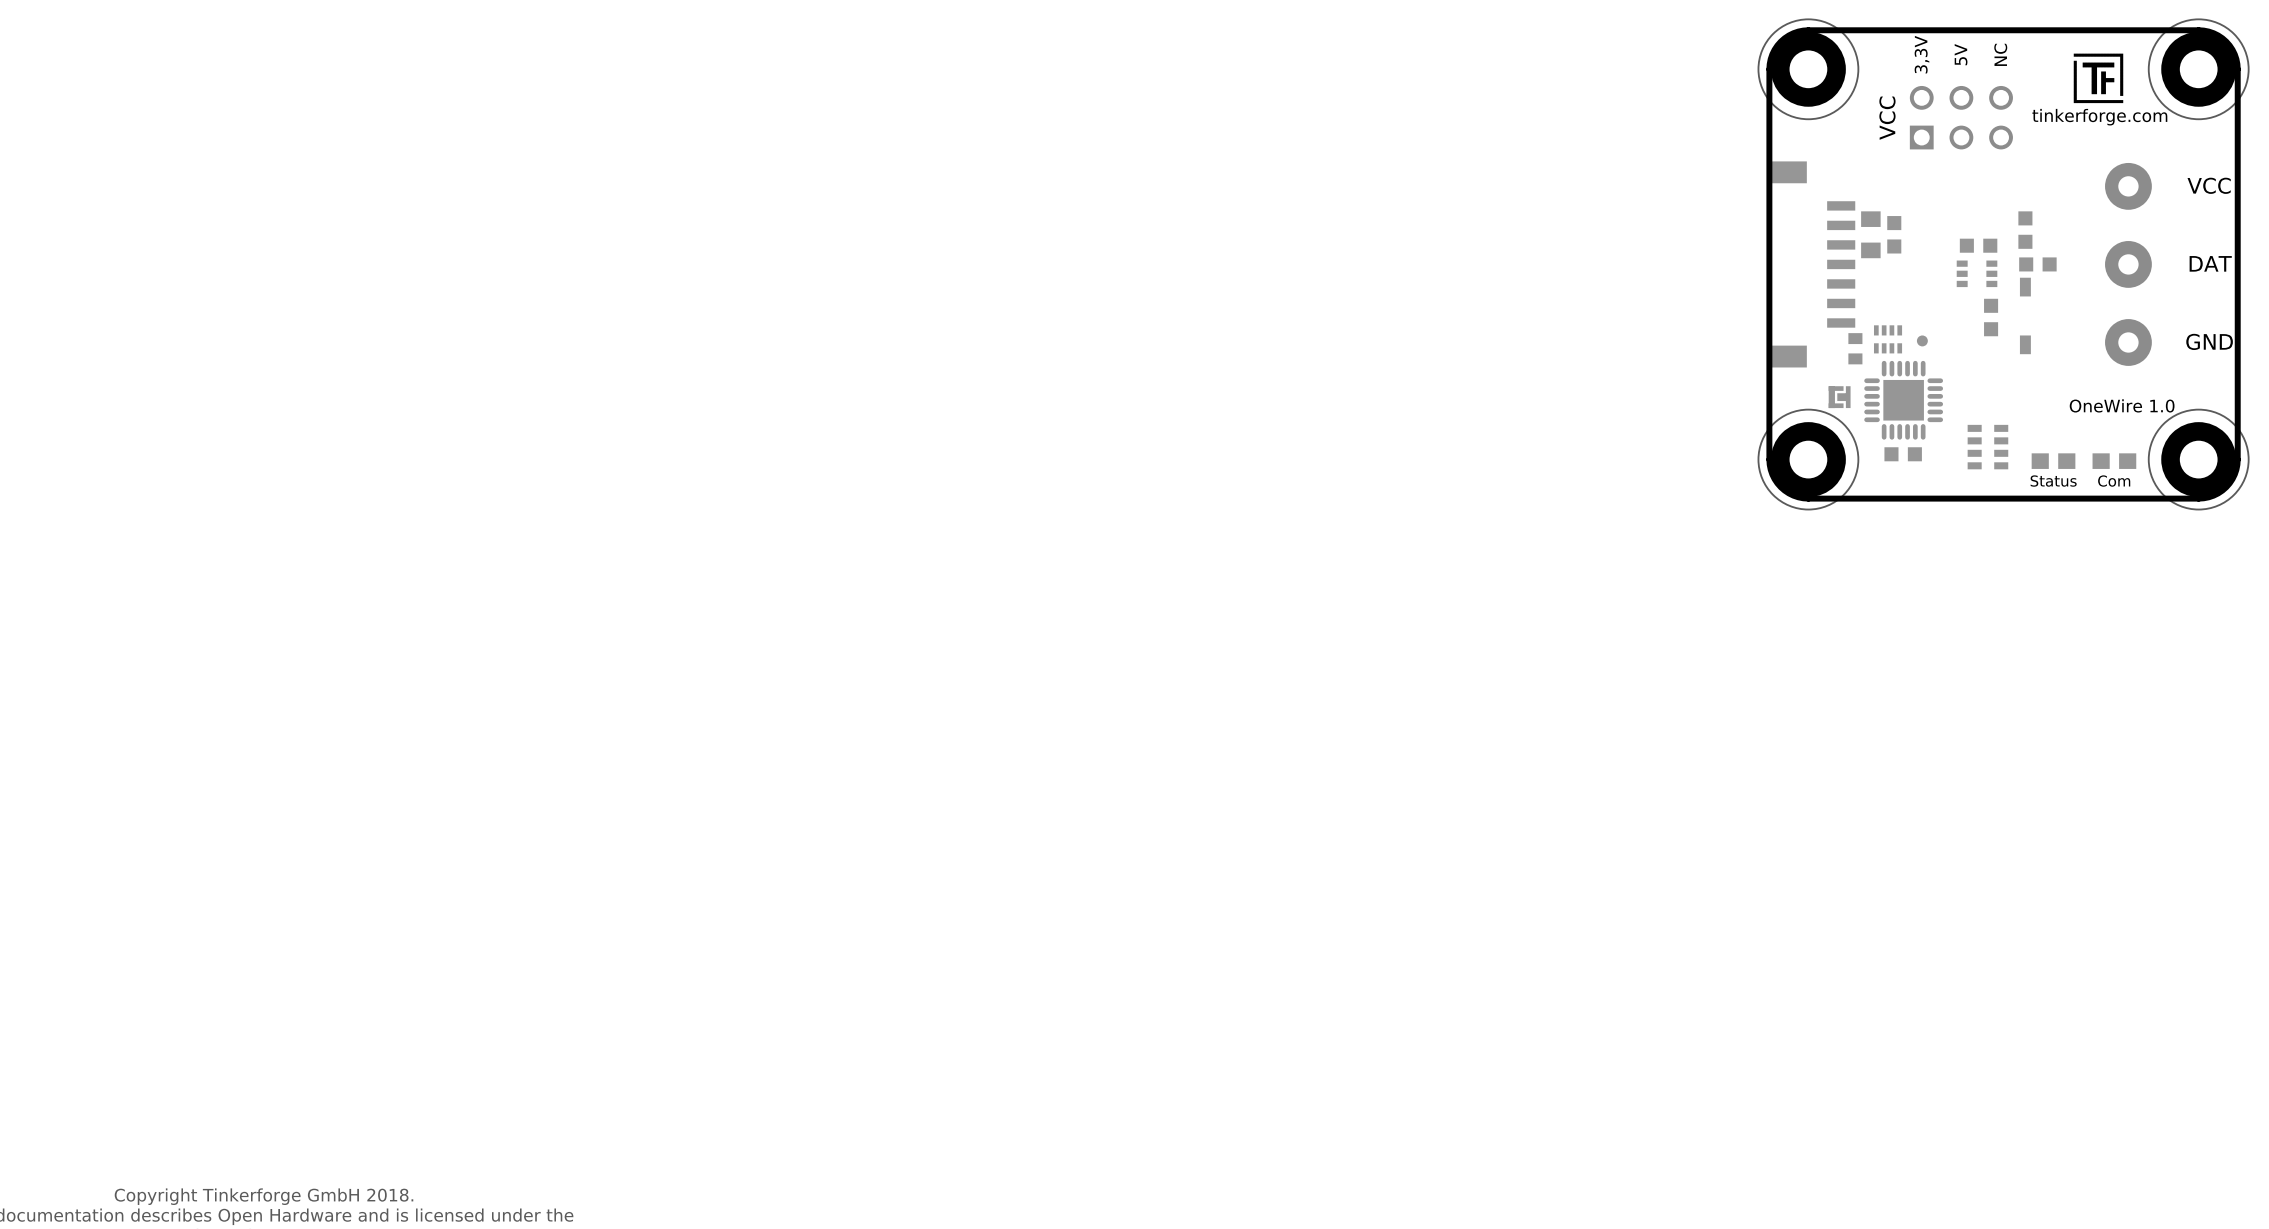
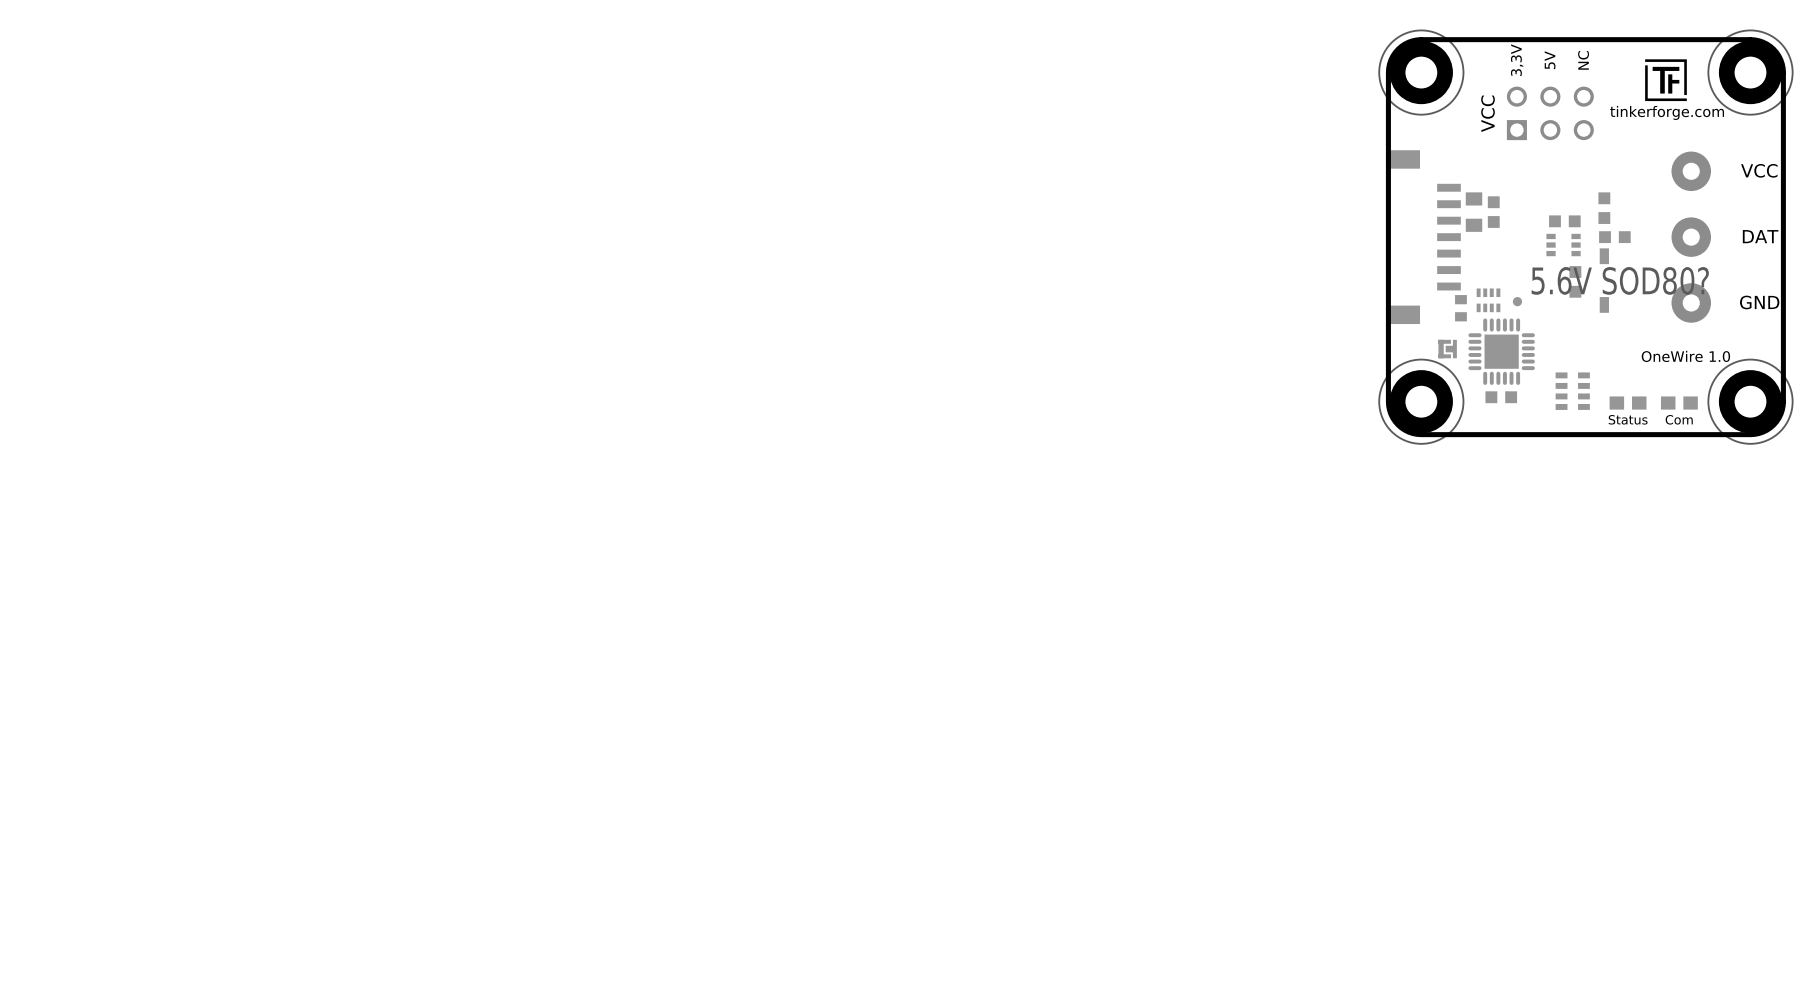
text: none -> 5.6V SOD80? (1620, 280)

